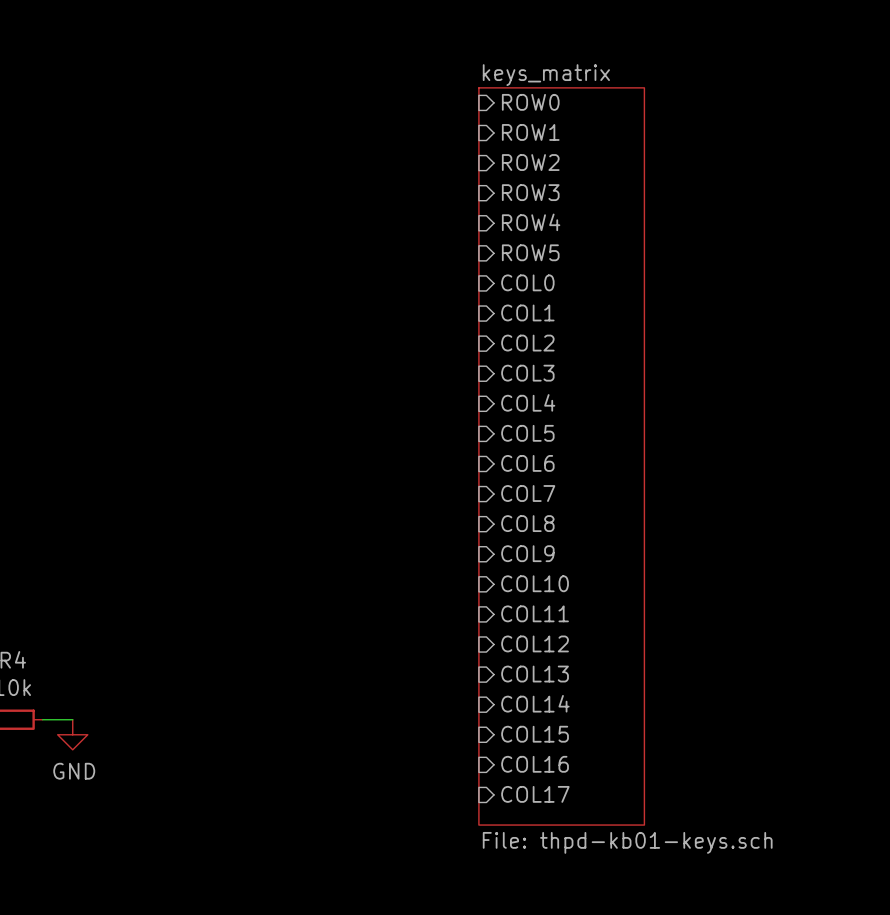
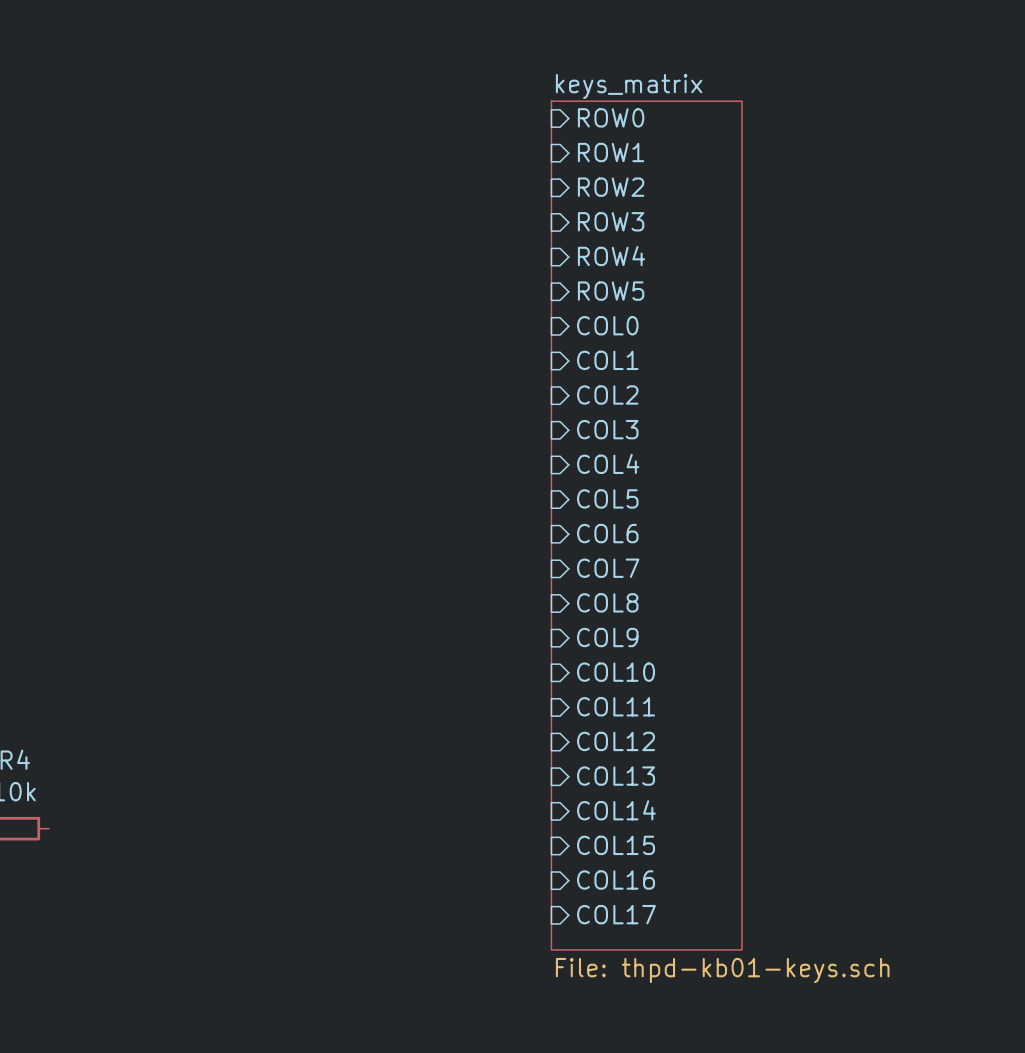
wire: (42, 719) (72, 719) -> none
power symbol: GND (72, 734) -> none

